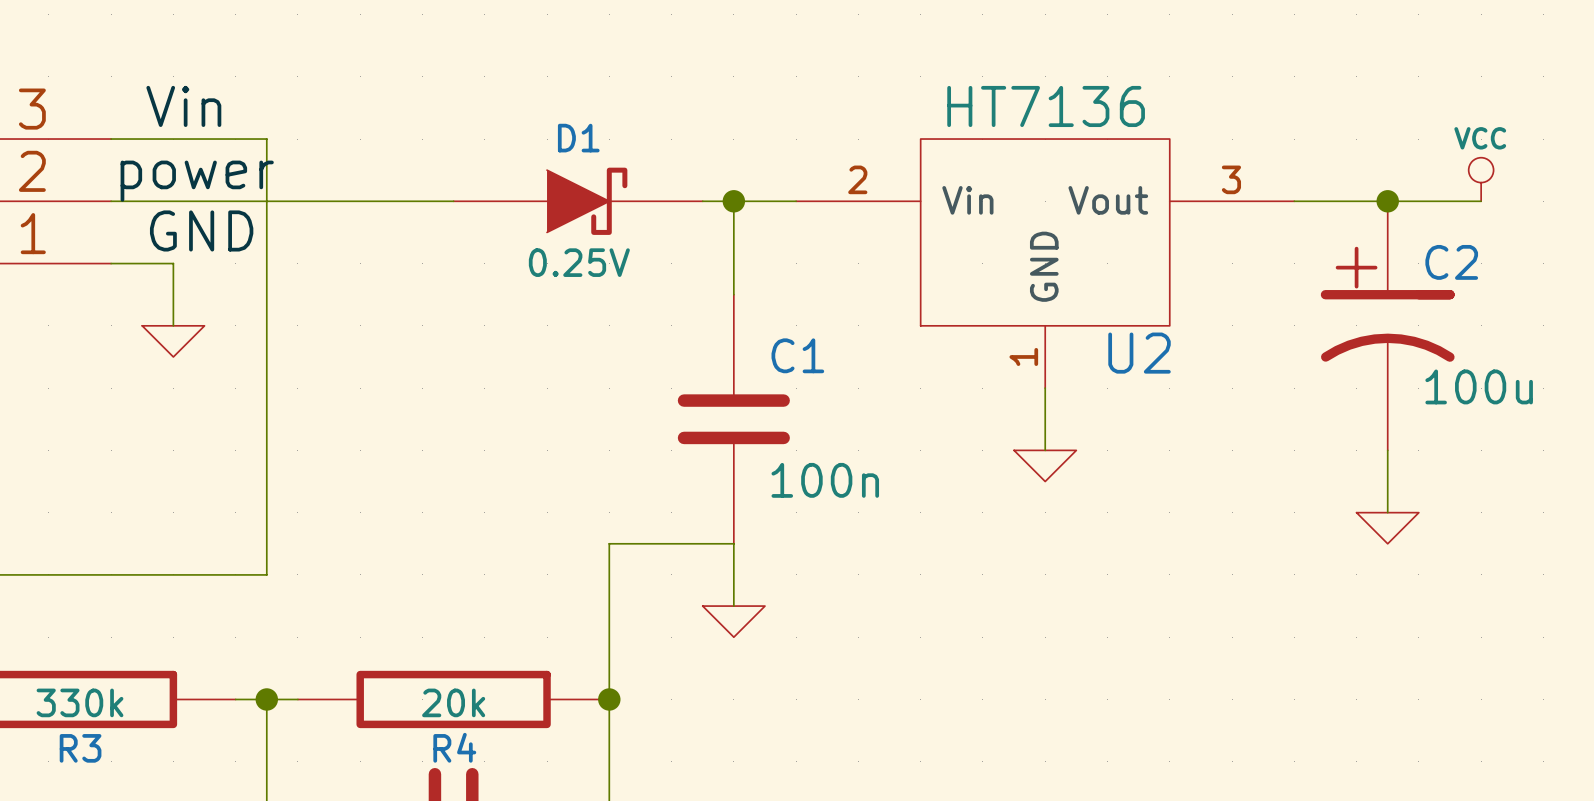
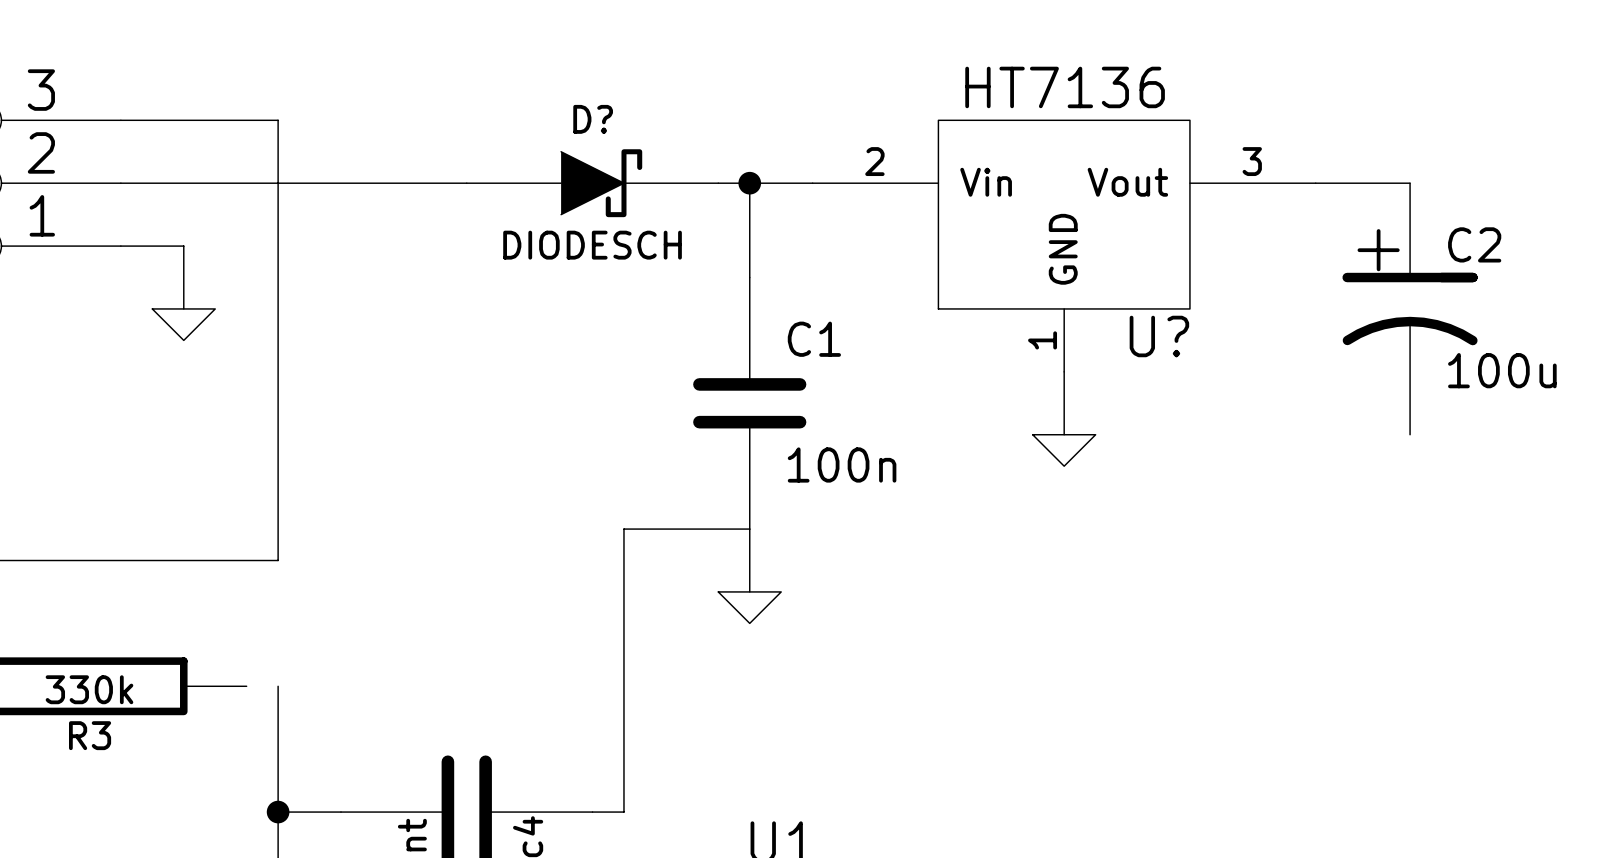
label: Vin (183, 106) -> none
D1 name: D1 (578, 138) -> D? (593, 119)
power symbol: VCC (1481, 179) -> none
label: power (197, 181) -> none
wire: (1387, 201) (1481, 201) -> none
junction: (1387, 201) -> none
label: GND (201, 230) -> none
D1 value: 0.25V (579, 262) -> DIODESCH (592, 245)
U2 name: U2 (1139, 353) -> U? (1159, 336)
wire: (1387, 450) (1387, 512) -> none
power symbol: (1387, 528) -> none
wire: (235, 699) (297, 699) -> none
junction: (266, 699) -> none
R4: 20k (453, 699) -> none
junction: (609, 699) -> none

